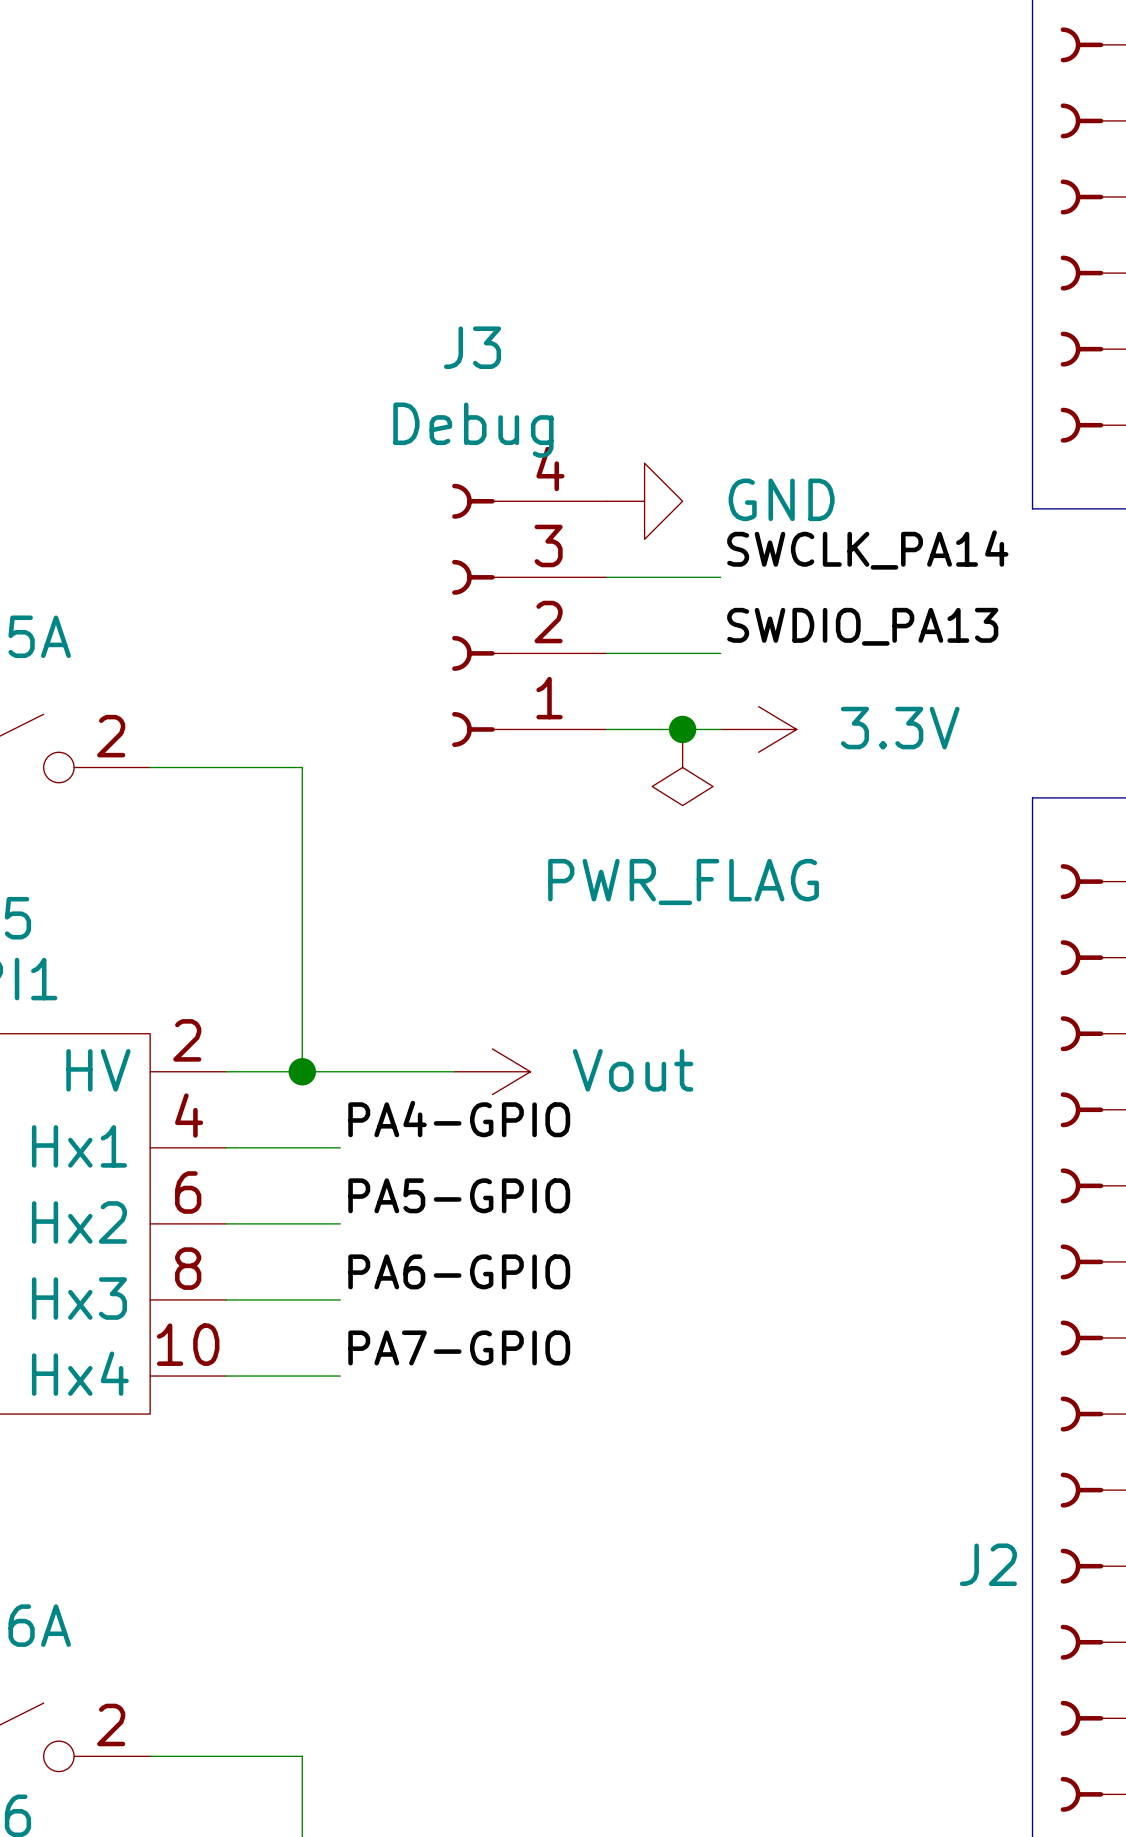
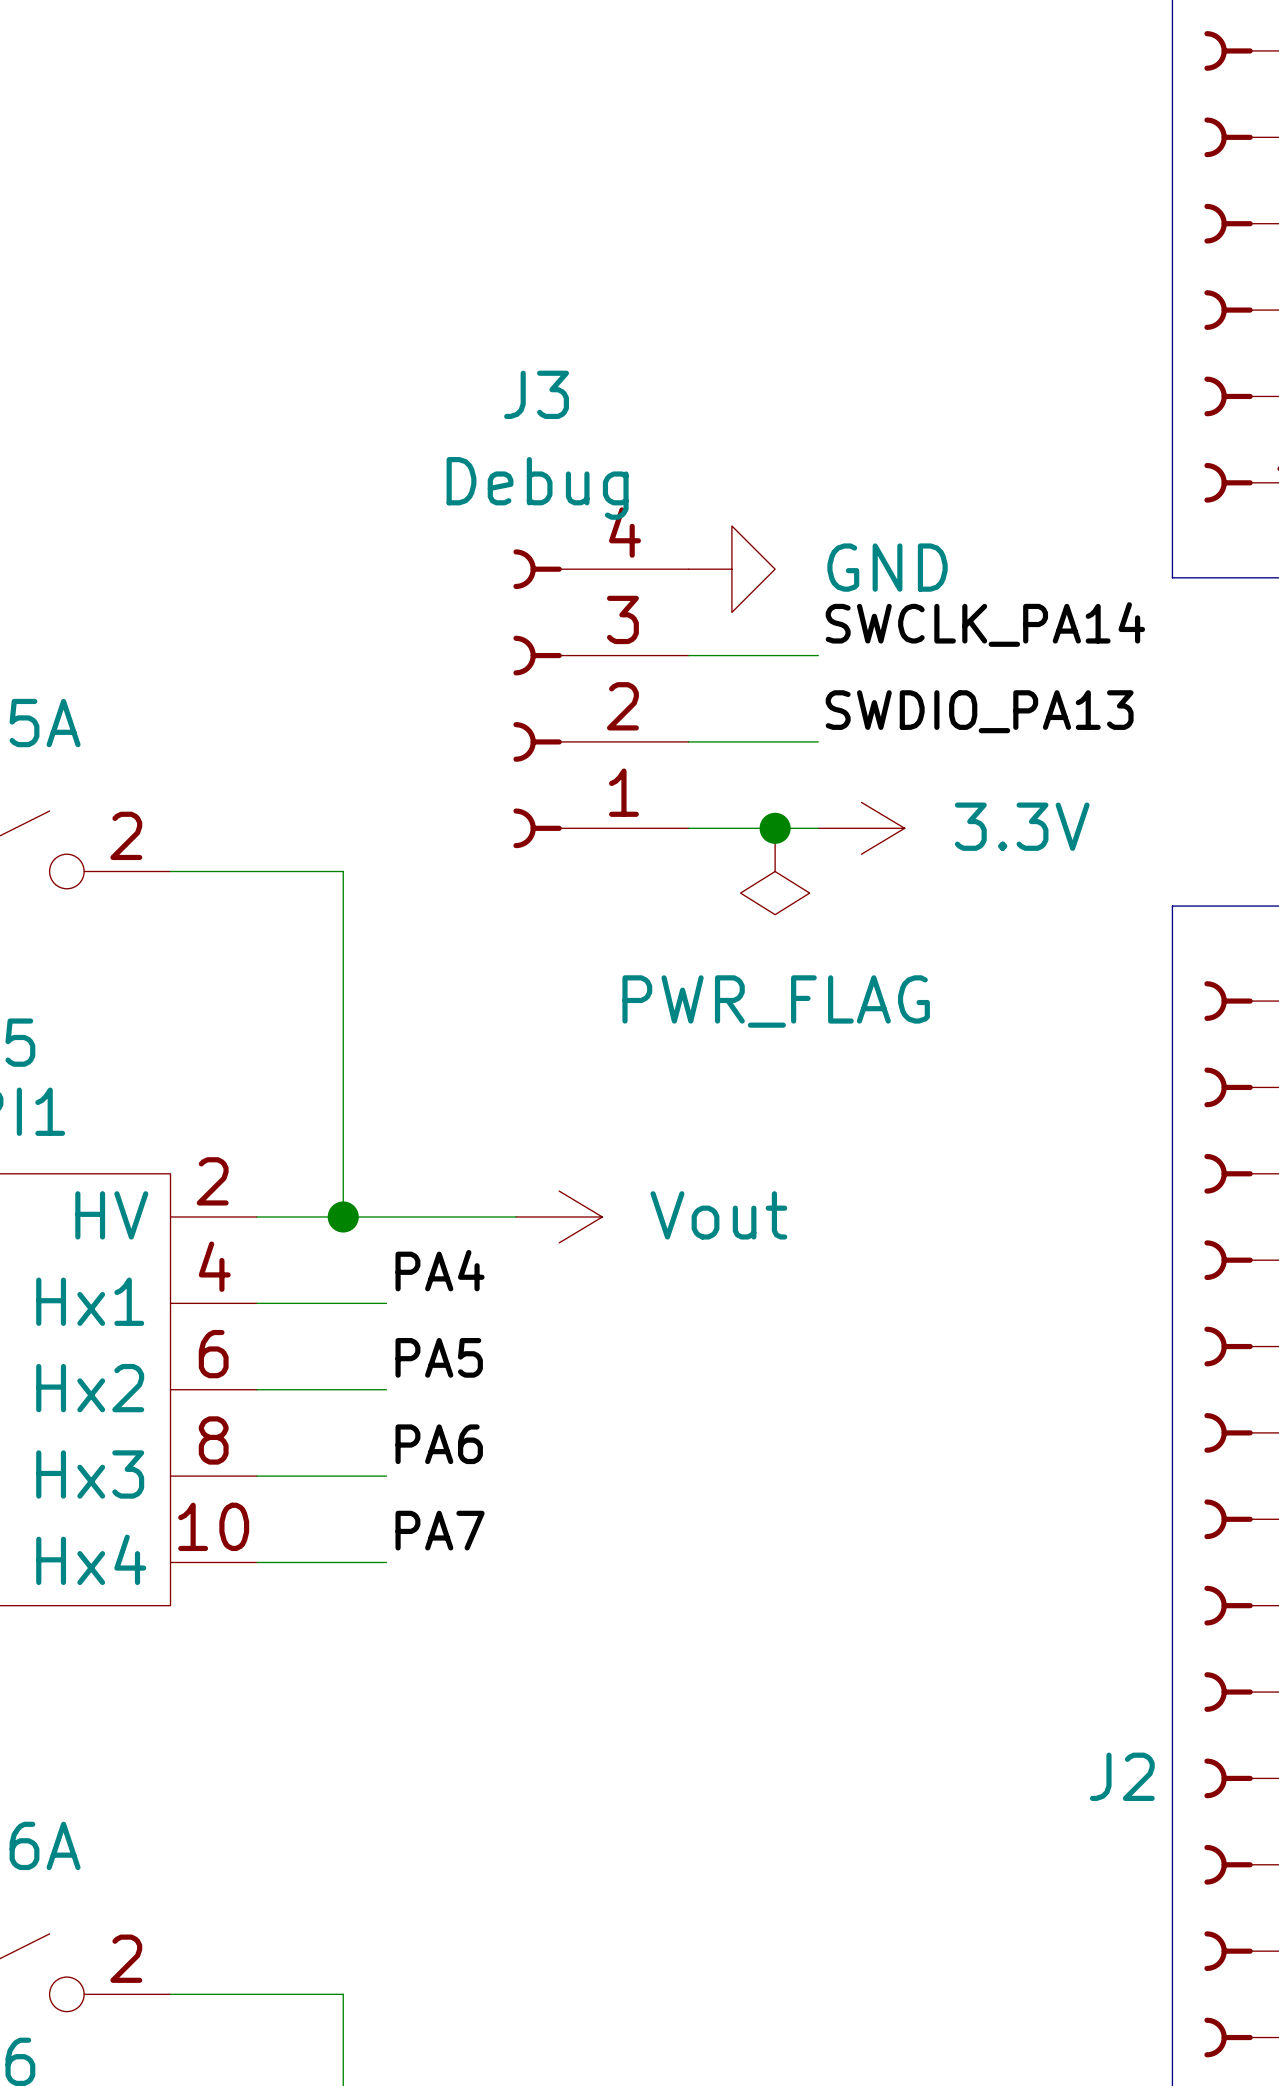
label: PA4-GPIO (459, 1119) -> PA4 (440, 1270)
label: PA5-GPIO (459, 1195) -> PA5 (439, 1357)
label: PA6-GPIO (459, 1271) -> PA6 (439, 1444)
label: PA7-GPIO (459, 1347) -> PA7 (440, 1530)

